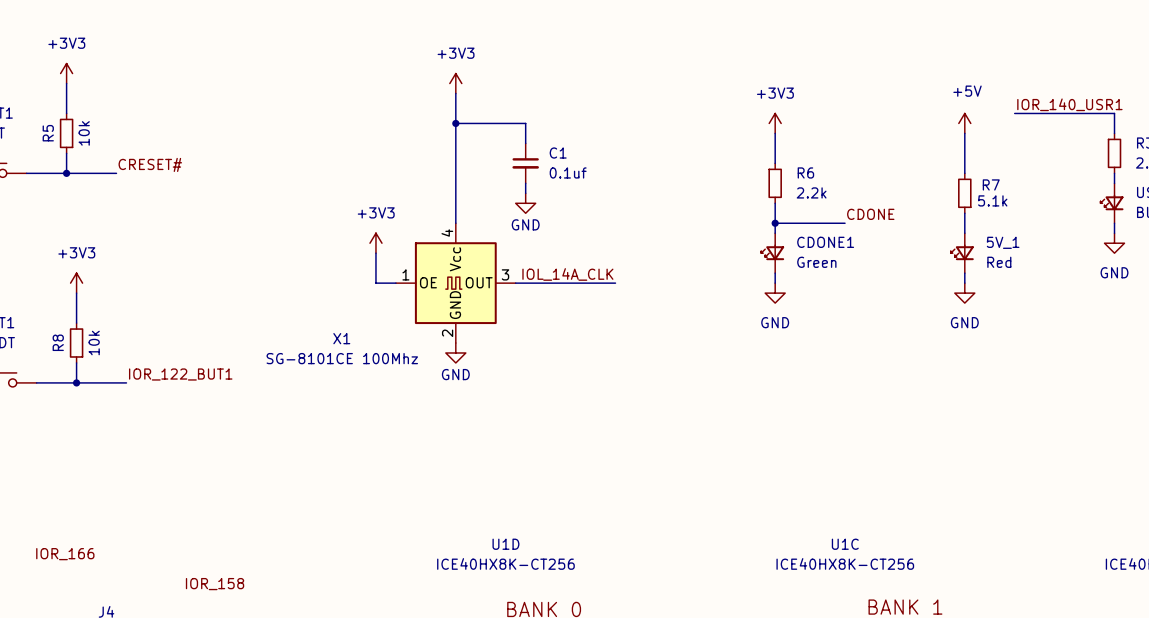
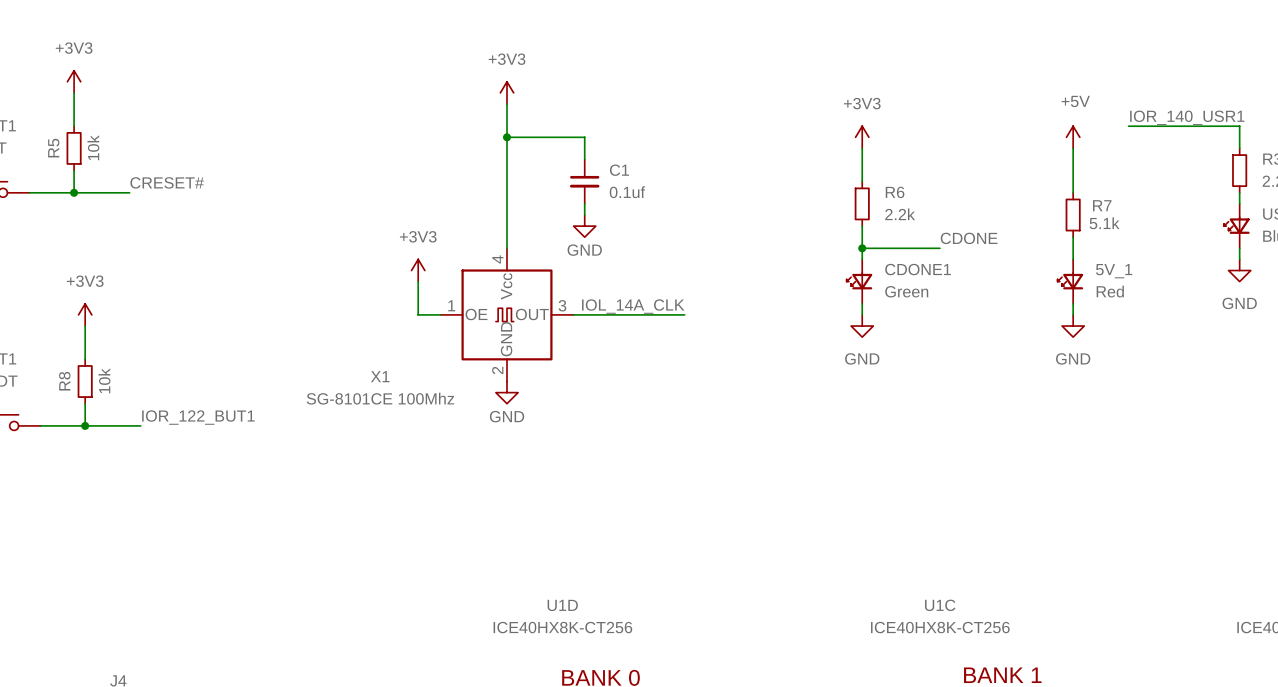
label: IOR_166 (65, 554) -> none
label: IOR_158 (215, 584) -> none

